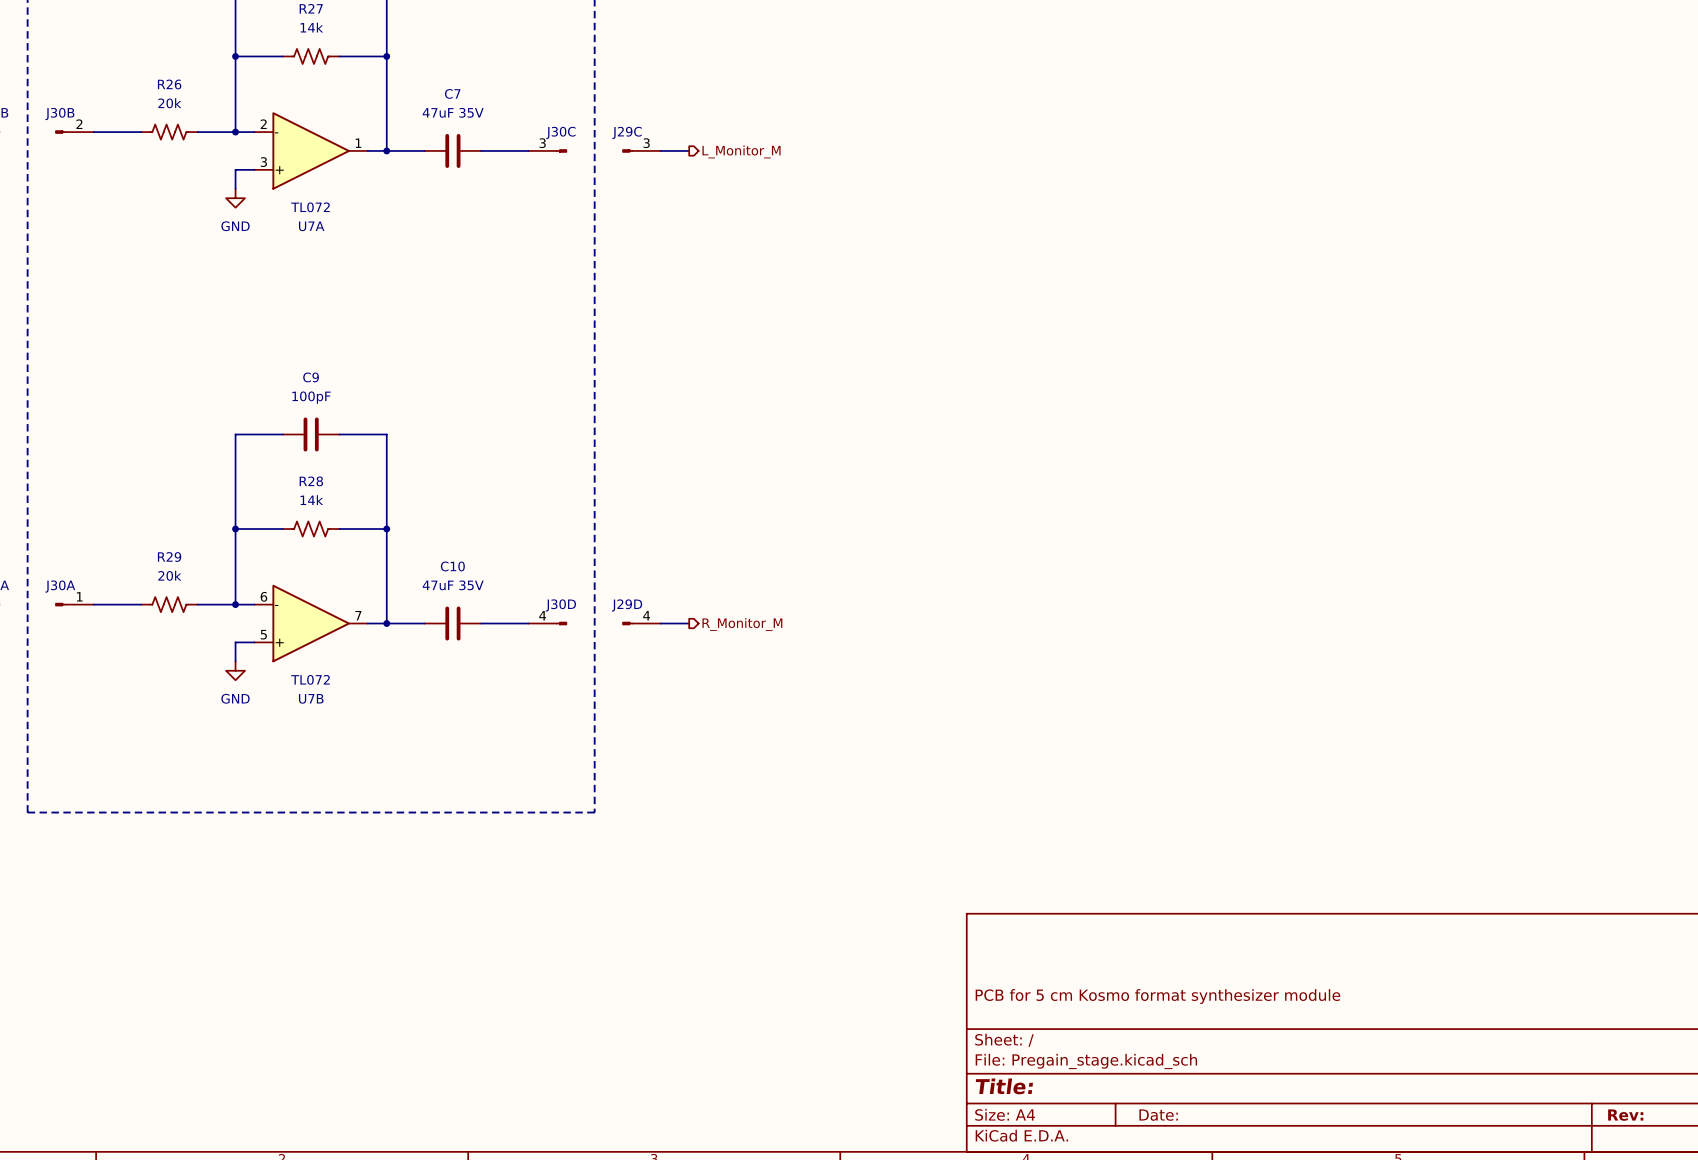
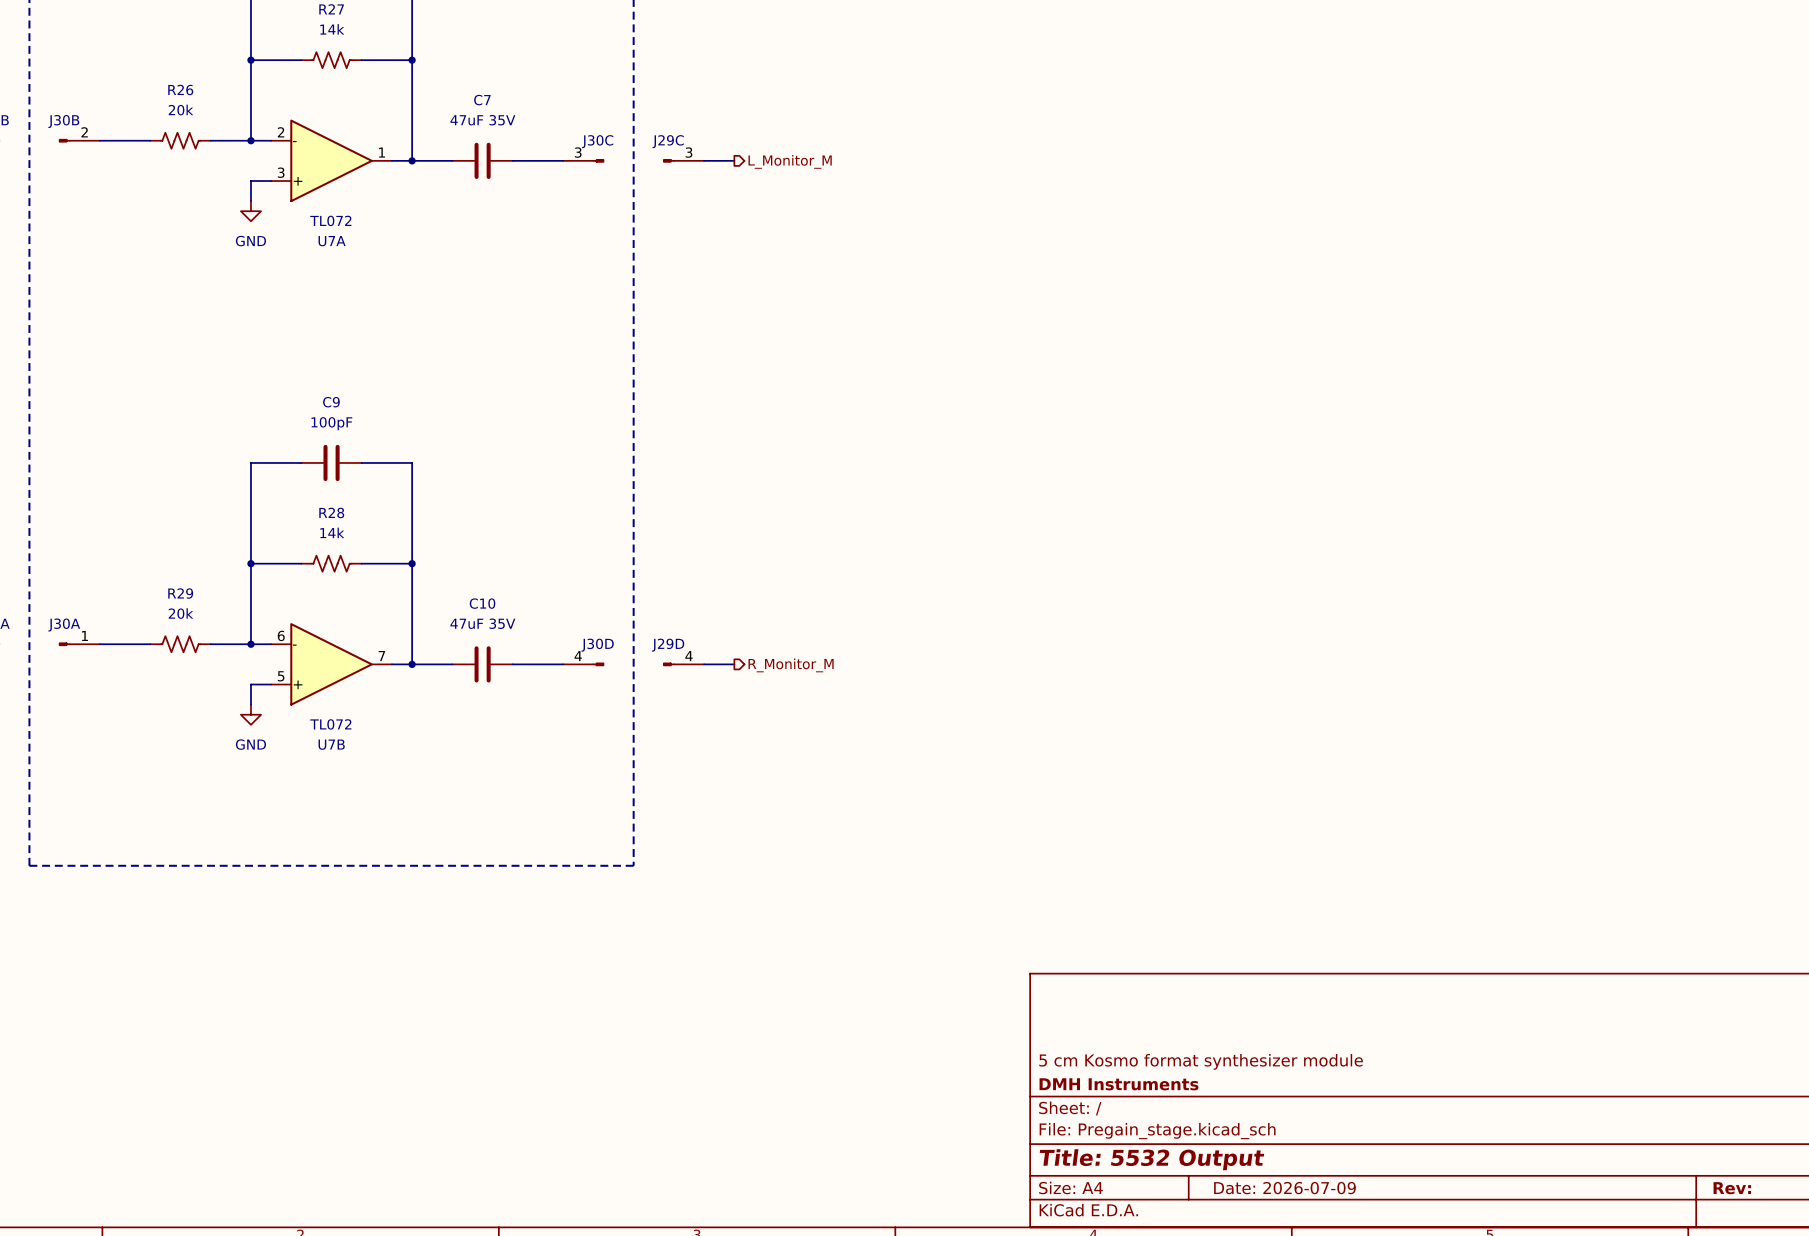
title block: PCB for 5 cm Kosmo format synthesizer module (1157, 996) -> 5 cm Kosmo format synthesizer module (1201, 1061)
title block: none -> DMH Instruments (1118, 1084)
title block: Title: (1004, 1086) -> Title: 5532 Output (1151, 1159)
title block: Date: (1158, 1115) -> Date: 2026-07-09 (1284, 1188)

